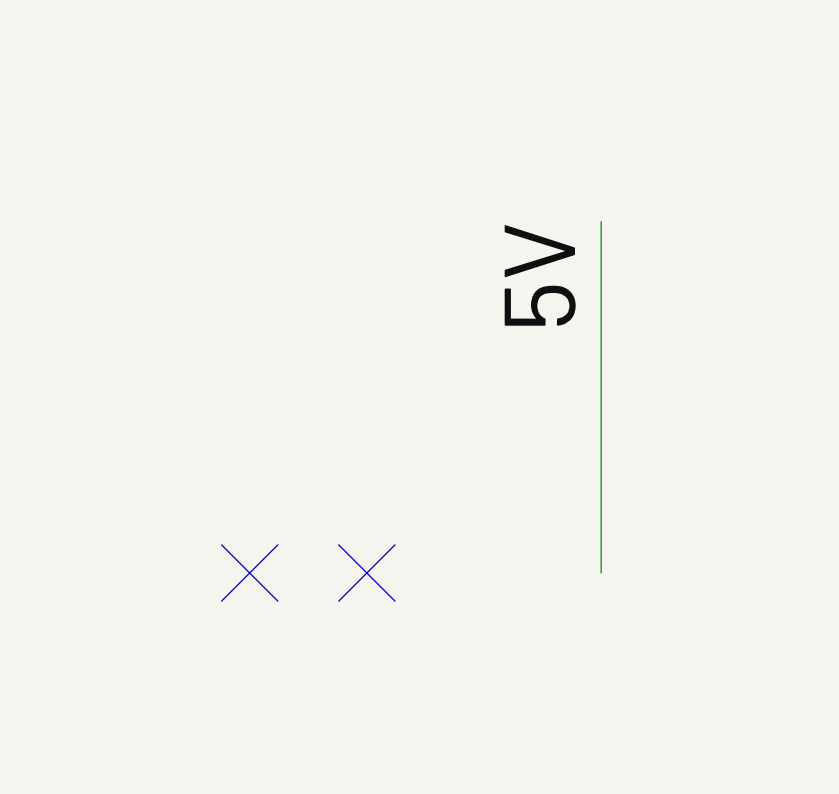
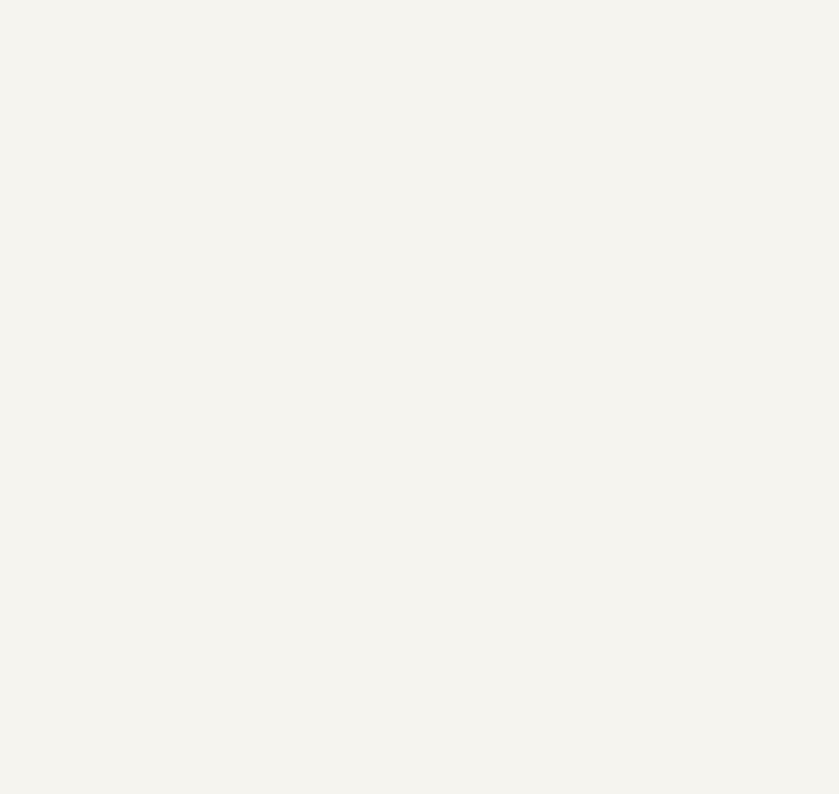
wire: (601, 221) (601, 573) -> none
label: 5V (540, 275) -> none
no-connect mark: (249, 573) -> none
no-connect mark: (366, 573) -> none

